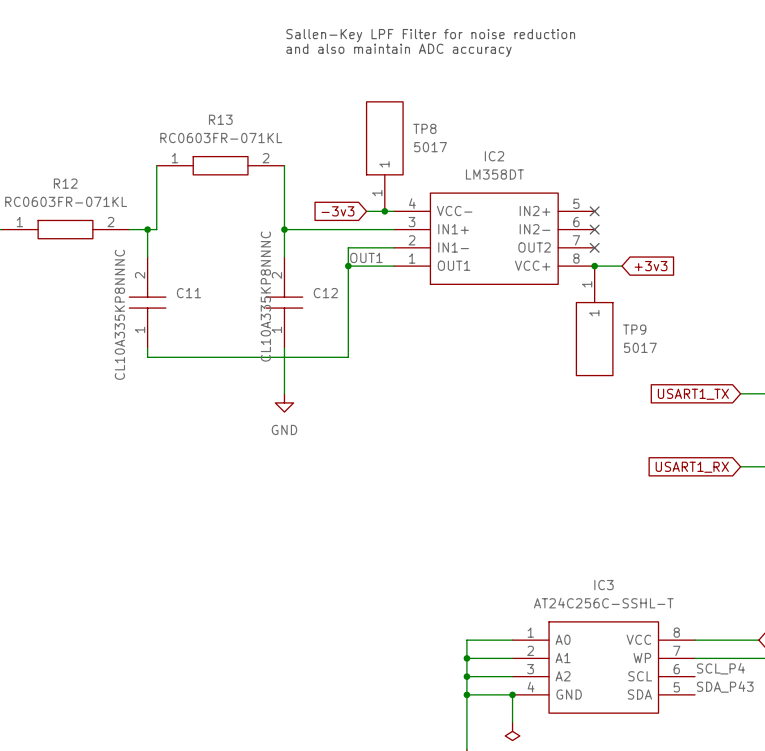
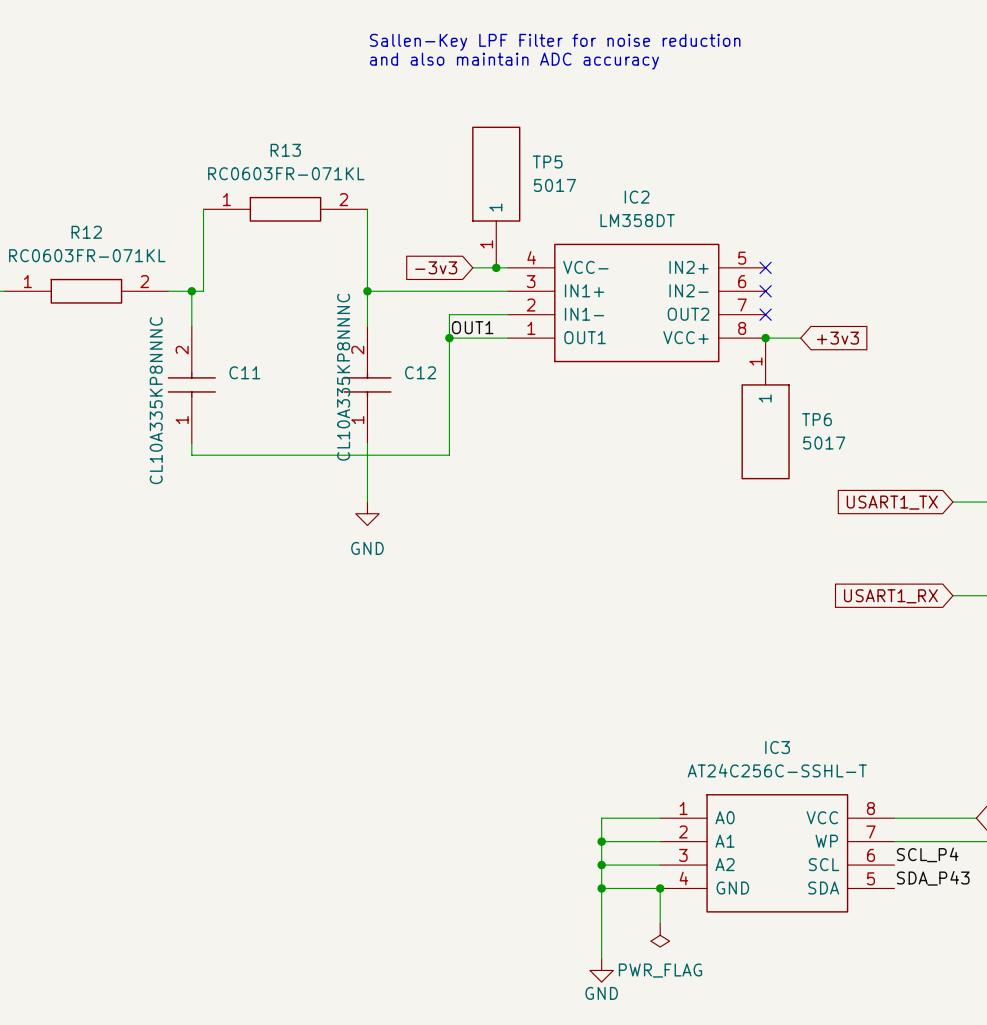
TP8 name: TP8 (424, 128) -> TP5 (547, 162)
TP9 name: TP9 (634, 329) -> TP6 (816, 419)

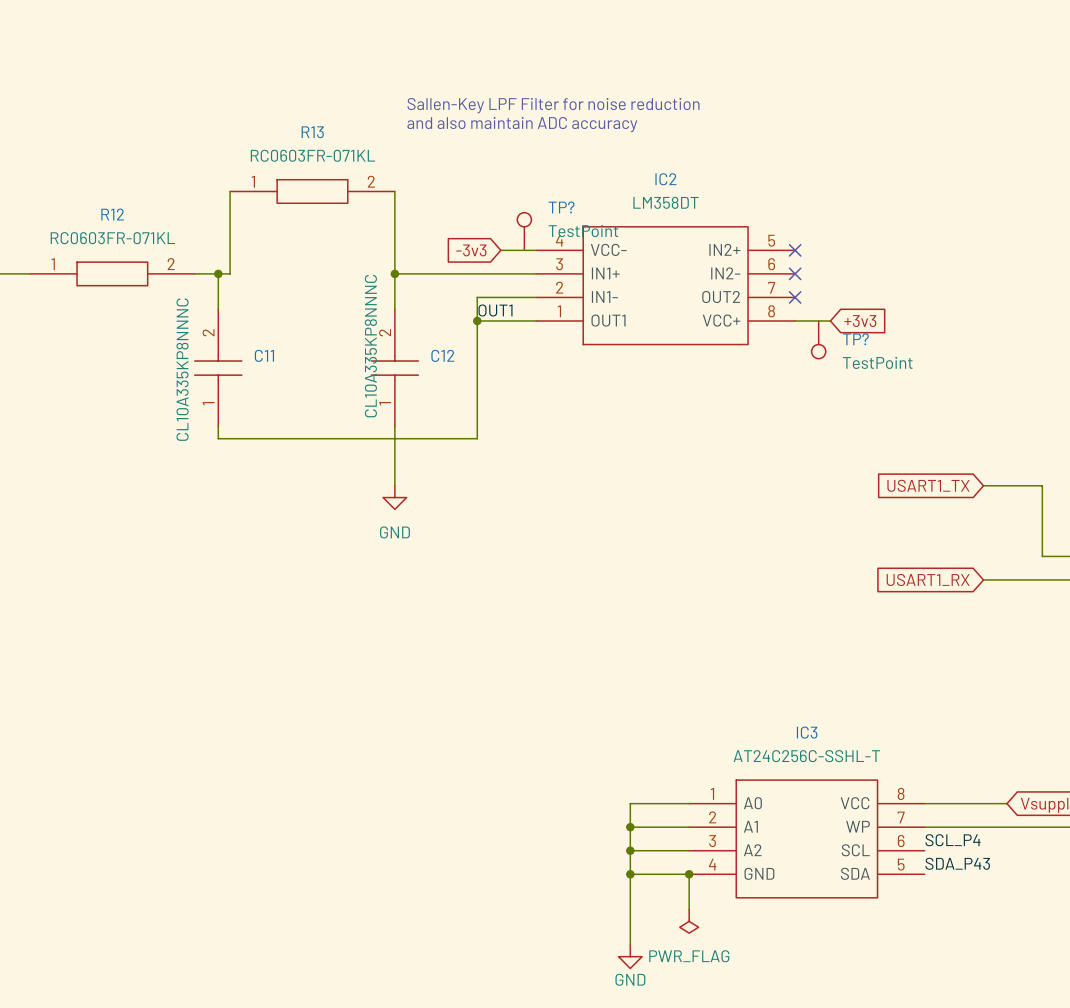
text position: Sallen-Key LPF Filter for noise reduction (555, 42) -> Sallen-Key LPF Filter for noise reduction (553, 105)
text position: and also maintain ADC accuracy (514, 61) -> and also maintain ADC accuracy (522, 124)
TP5: 5017 (496, 197) -> none
TP?: none -> TestPoint (524, 231)
junction: (496, 267) -> none
junction: (765, 338) -> none
TP?: none -> TestPoint (818, 339)
TP6: 5017 (765, 408) -> none

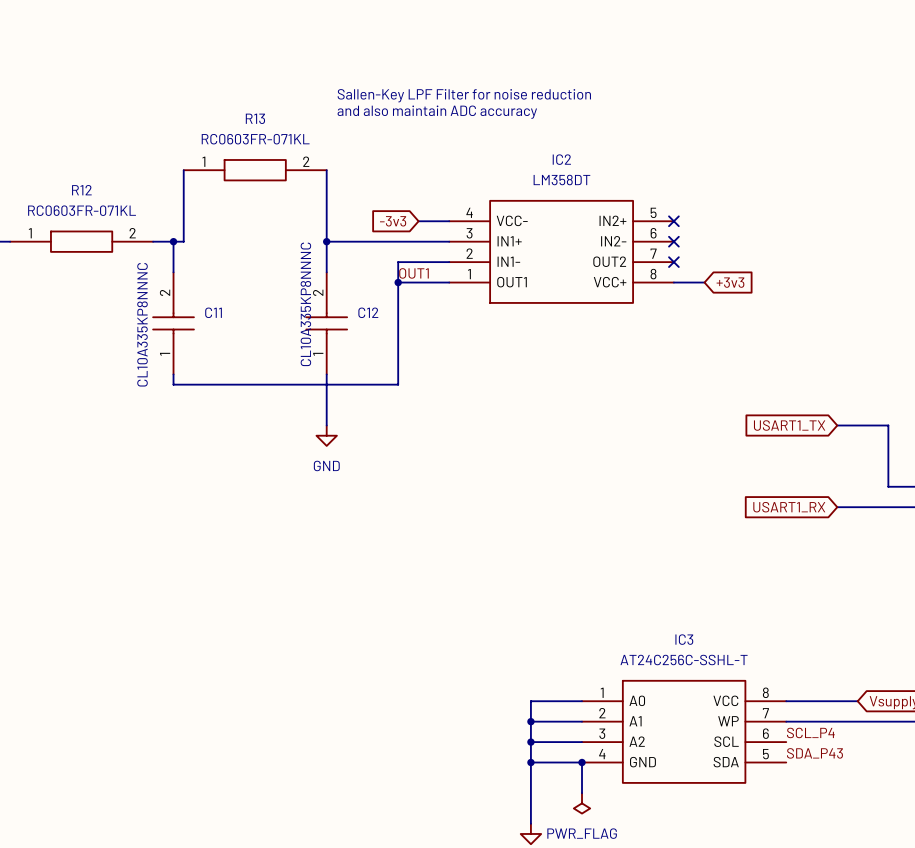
TP?: TestPoint (524, 231) -> none
TP?: TestPoint (818, 339) -> none

